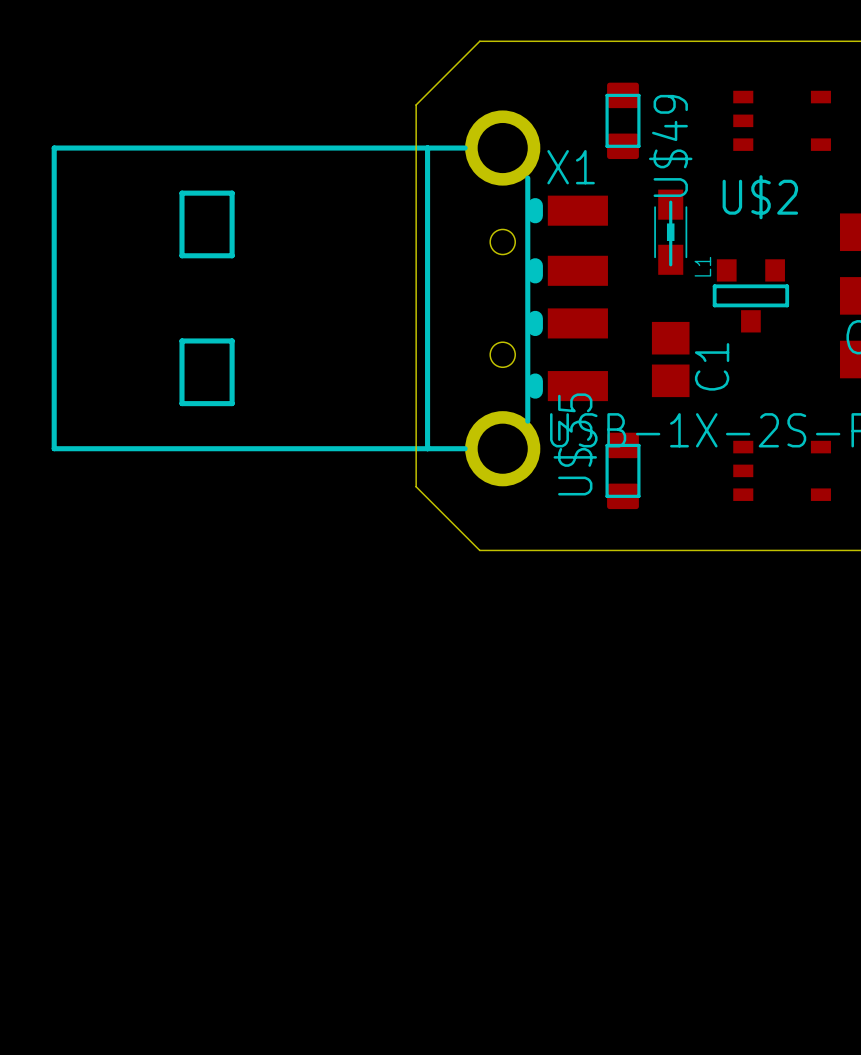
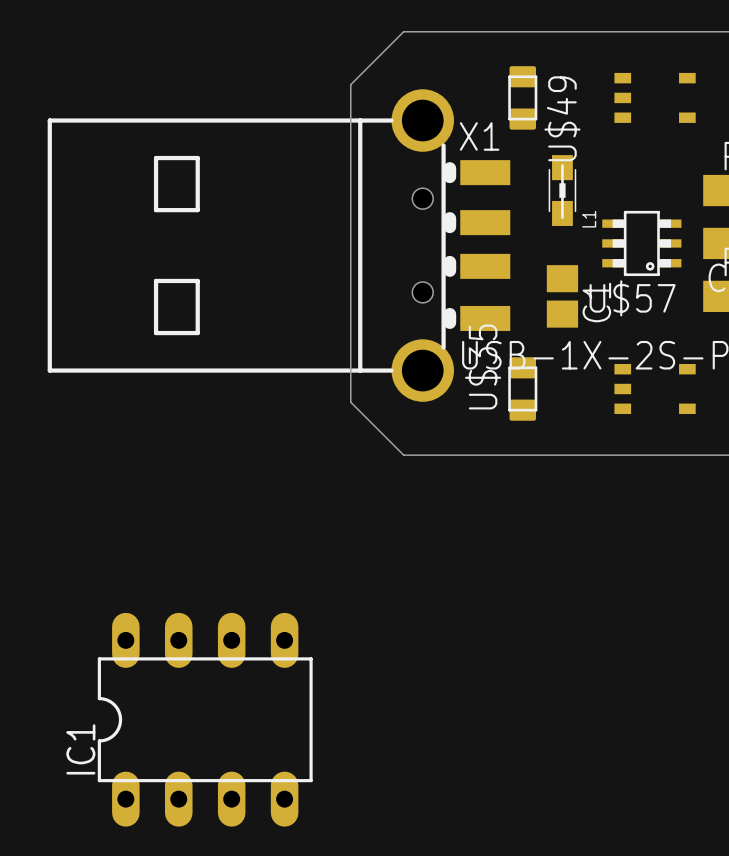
U$2: (750, 295) -> none
U$57: none -> (641, 243)
IC1: none -> (205, 719)

